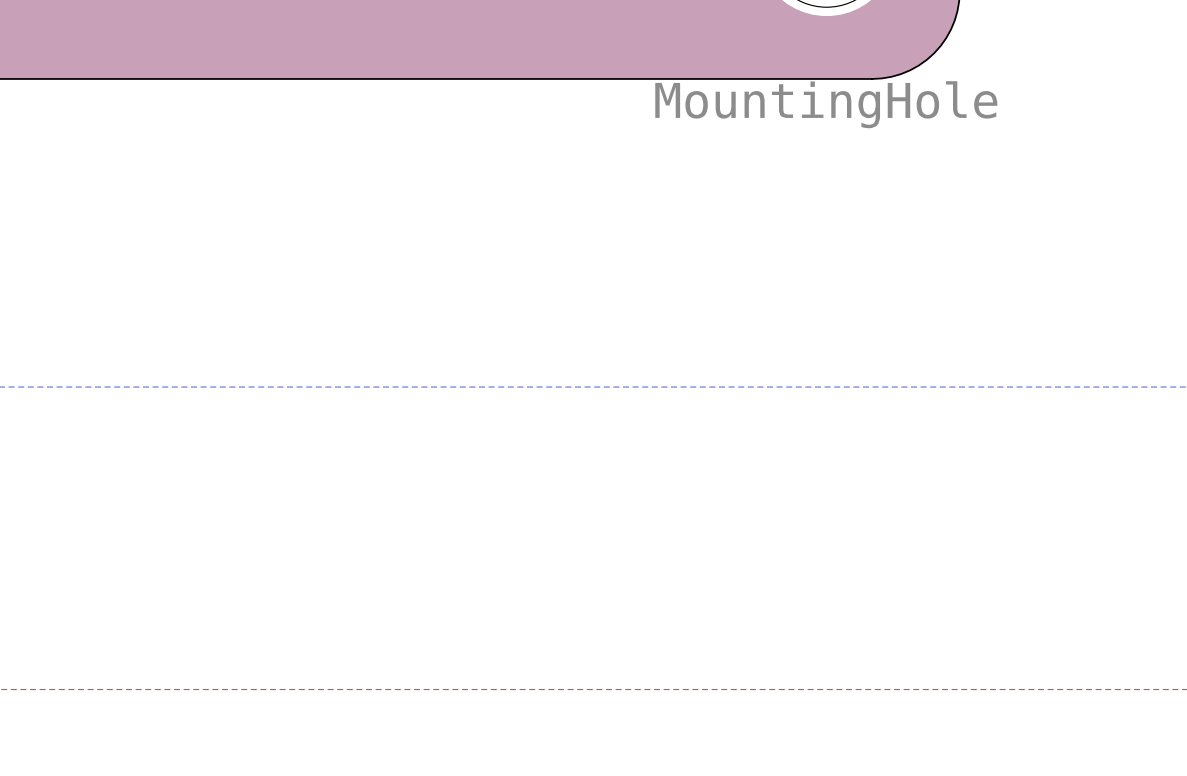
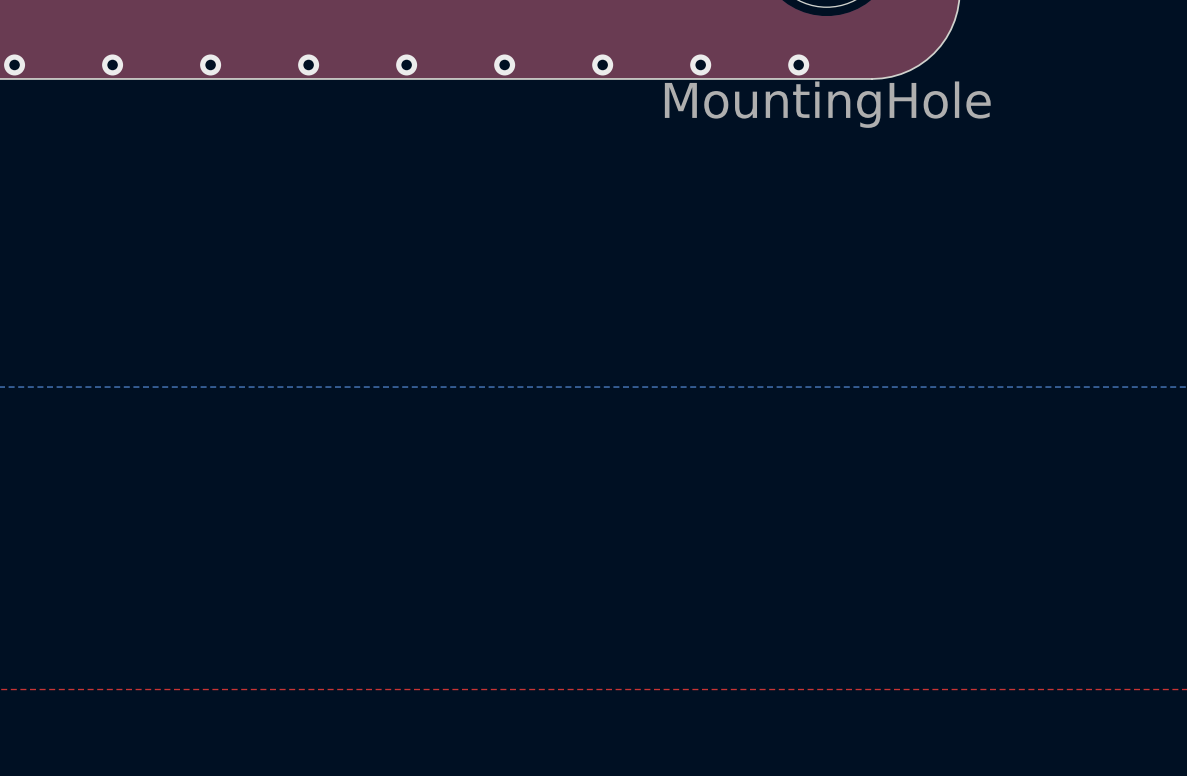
via: none -> (14, 64)
via: none -> (112, 64)
via: none -> (210, 64)
via: none -> (308, 64)
via: none -> (406, 64)
via: none -> (504, 64)
via: none -> (602, 64)
via: none -> (700, 64)
via: none -> (798, 64)

